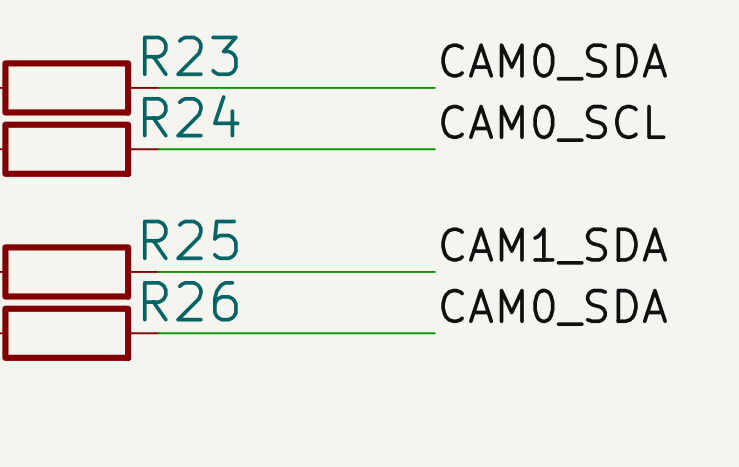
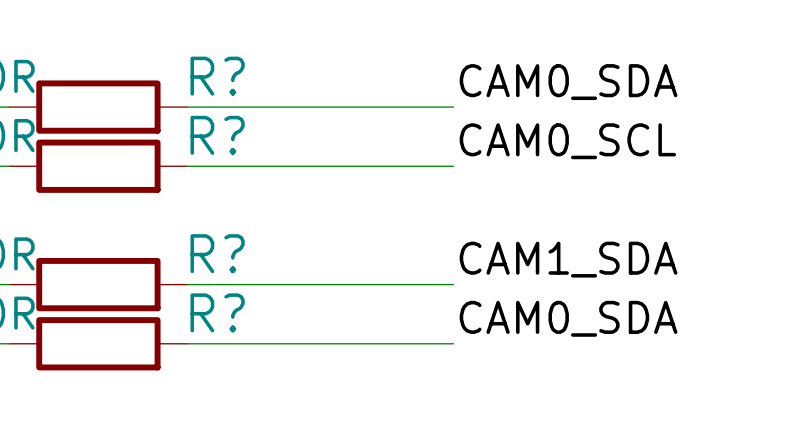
R23 name: R23 (190, 55) -> R? (217, 76)
R24 name: R24 (191, 116) -> R? (217, 135)
R25 name: R25 (190, 239) -> R? (217, 253)
R26 name: R26 (190, 301) -> R? (217, 312)

